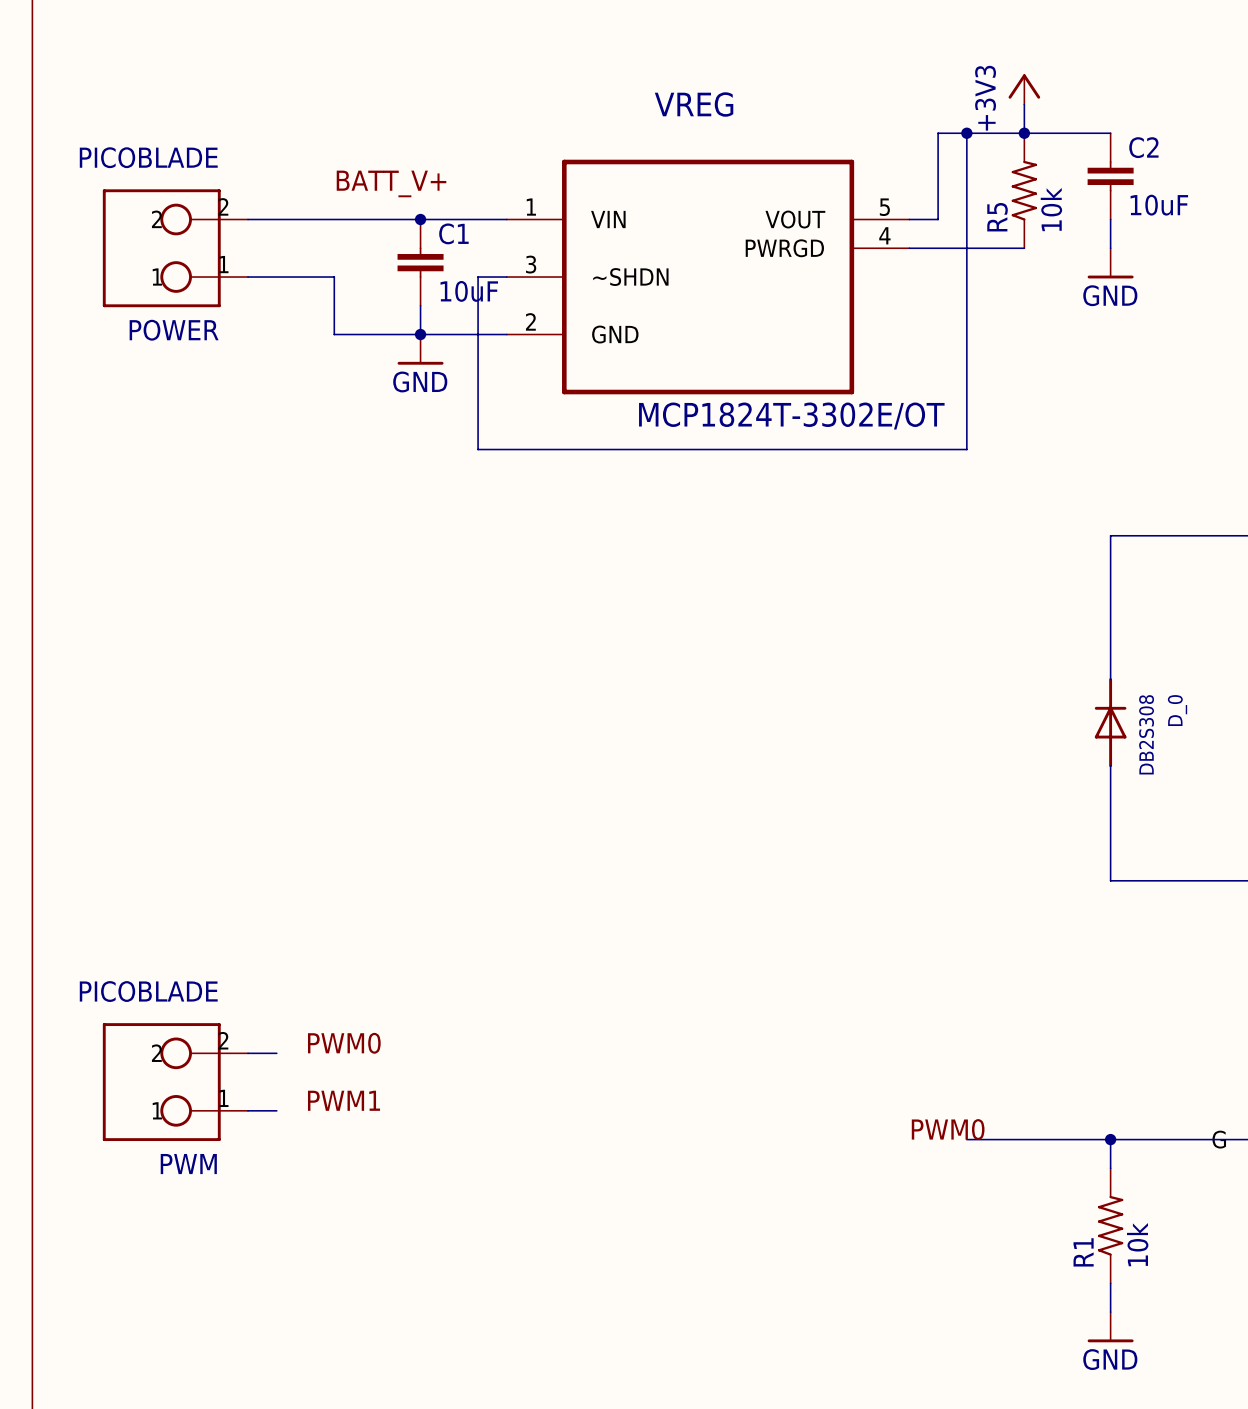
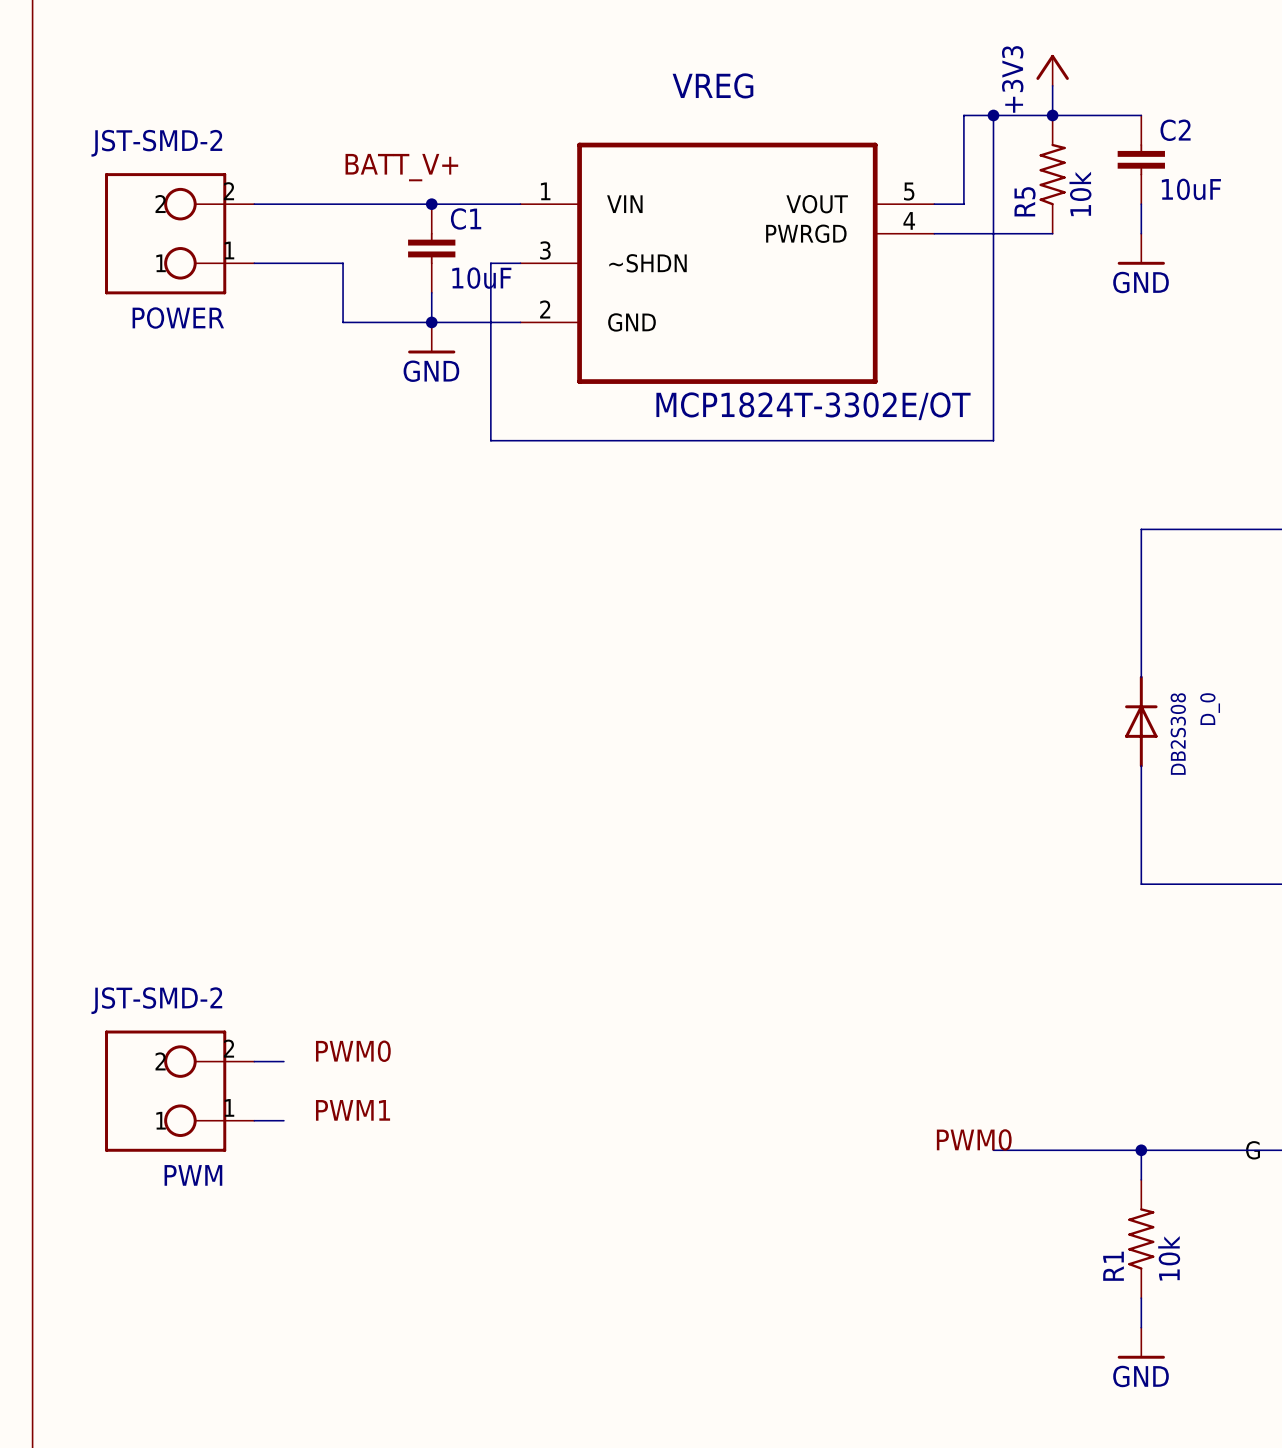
POWER value: PICOBLADE (148, 157) -> JST-SMD-2 (156, 143)
PWM value: PICOBLADE (148, 991) -> JST-SMD-2 (156, 1000)

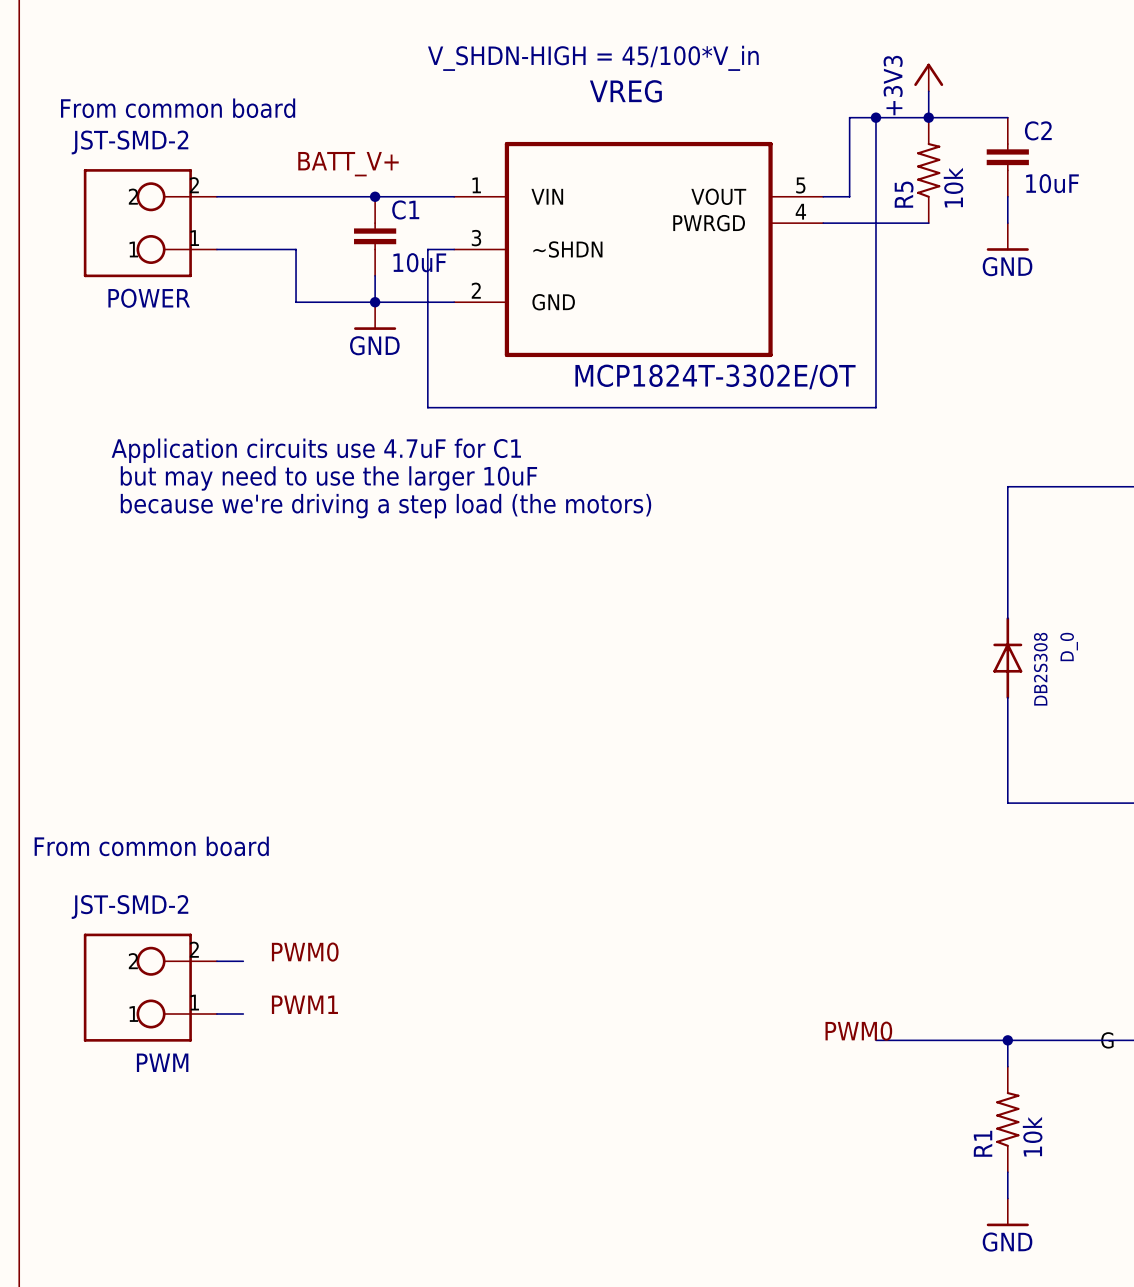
text: none -> V_SHDN-HIGH = 45/100*V_in (593, 58)
text: none -> From common board (178, 108)
text: none -> Application circuits use 4.7uF for C1 (316, 450)
text: none -> but may need to use the larger 10uF (328, 478)
text: none -> because we're driving a step load (the motors) (386, 506)
text: none -> From common board (151, 846)

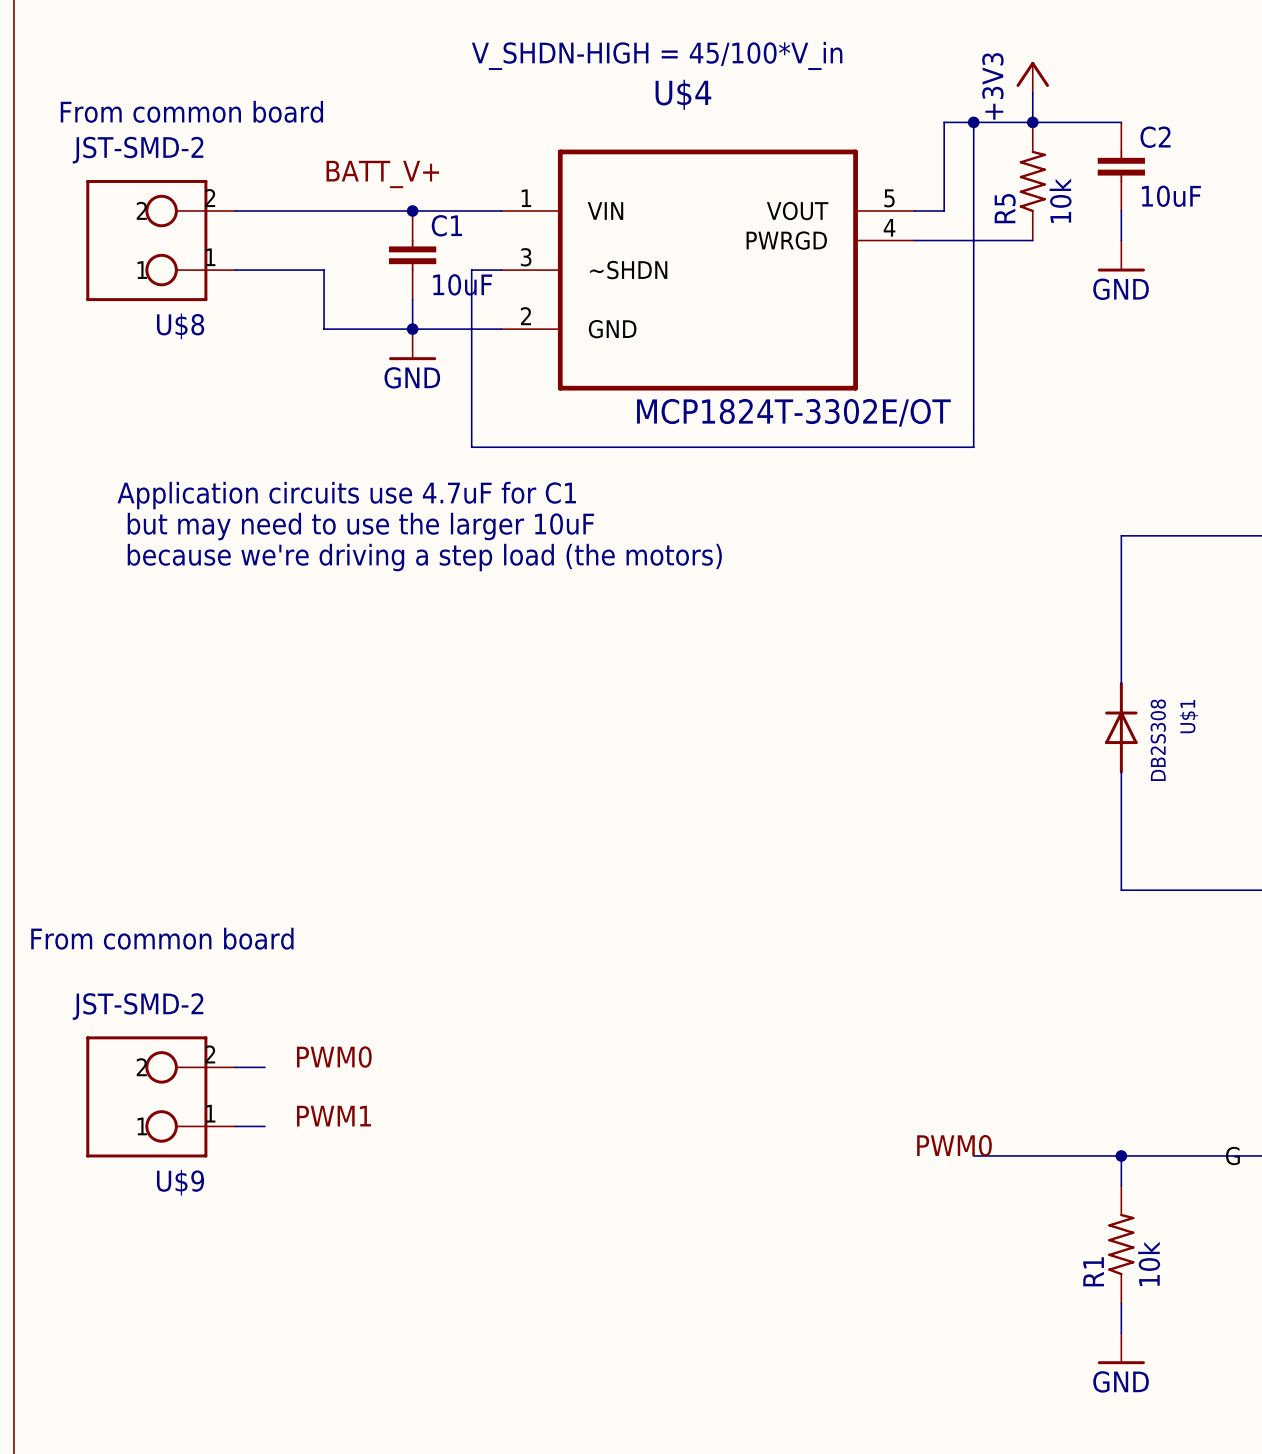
VREG name: VREG (625, 91) -> U$4 (683, 94)
POWER name: POWER (149, 298) -> U$8 (180, 326)
D_0 name: D_0 (1069, 647) -> U$1 (1188, 716)
PWM name: PWM (162, 1062) -> U$9 (180, 1182)

